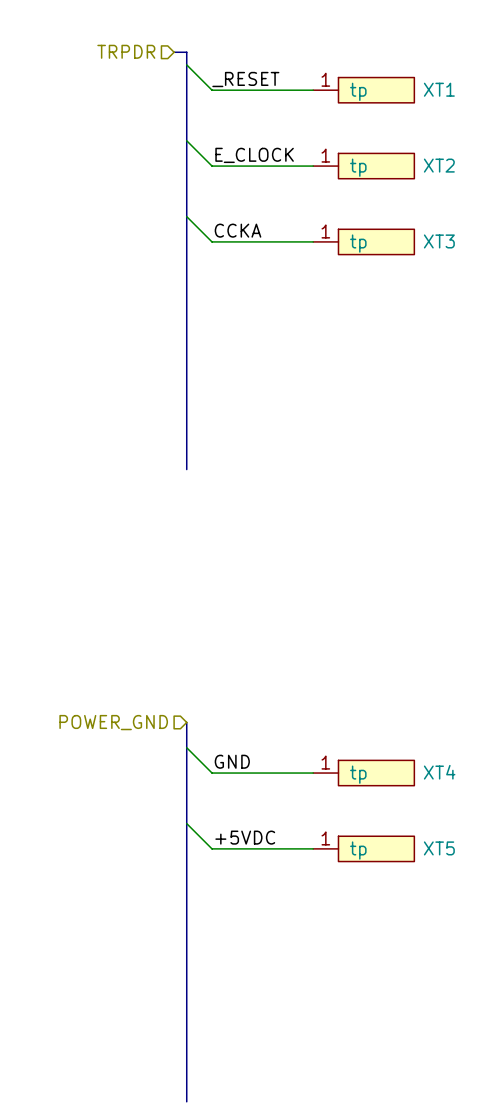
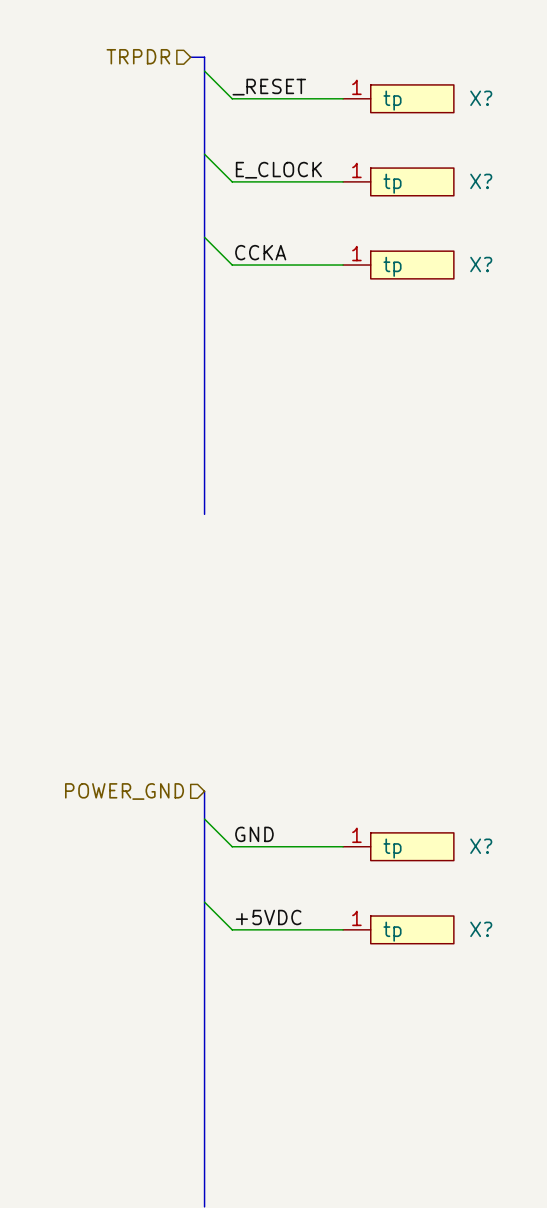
XT1 name: XT1 (439, 89) -> X? (481, 98)
XT2 name: XT2 (439, 165) -> X? (481, 181)
XT3 name: XT3 (439, 241) -> X? (481, 264)
XT4 name: XT4 (439, 772) -> X? (481, 846)
XT5 name: XT5 (439, 848) -> X? (481, 929)

